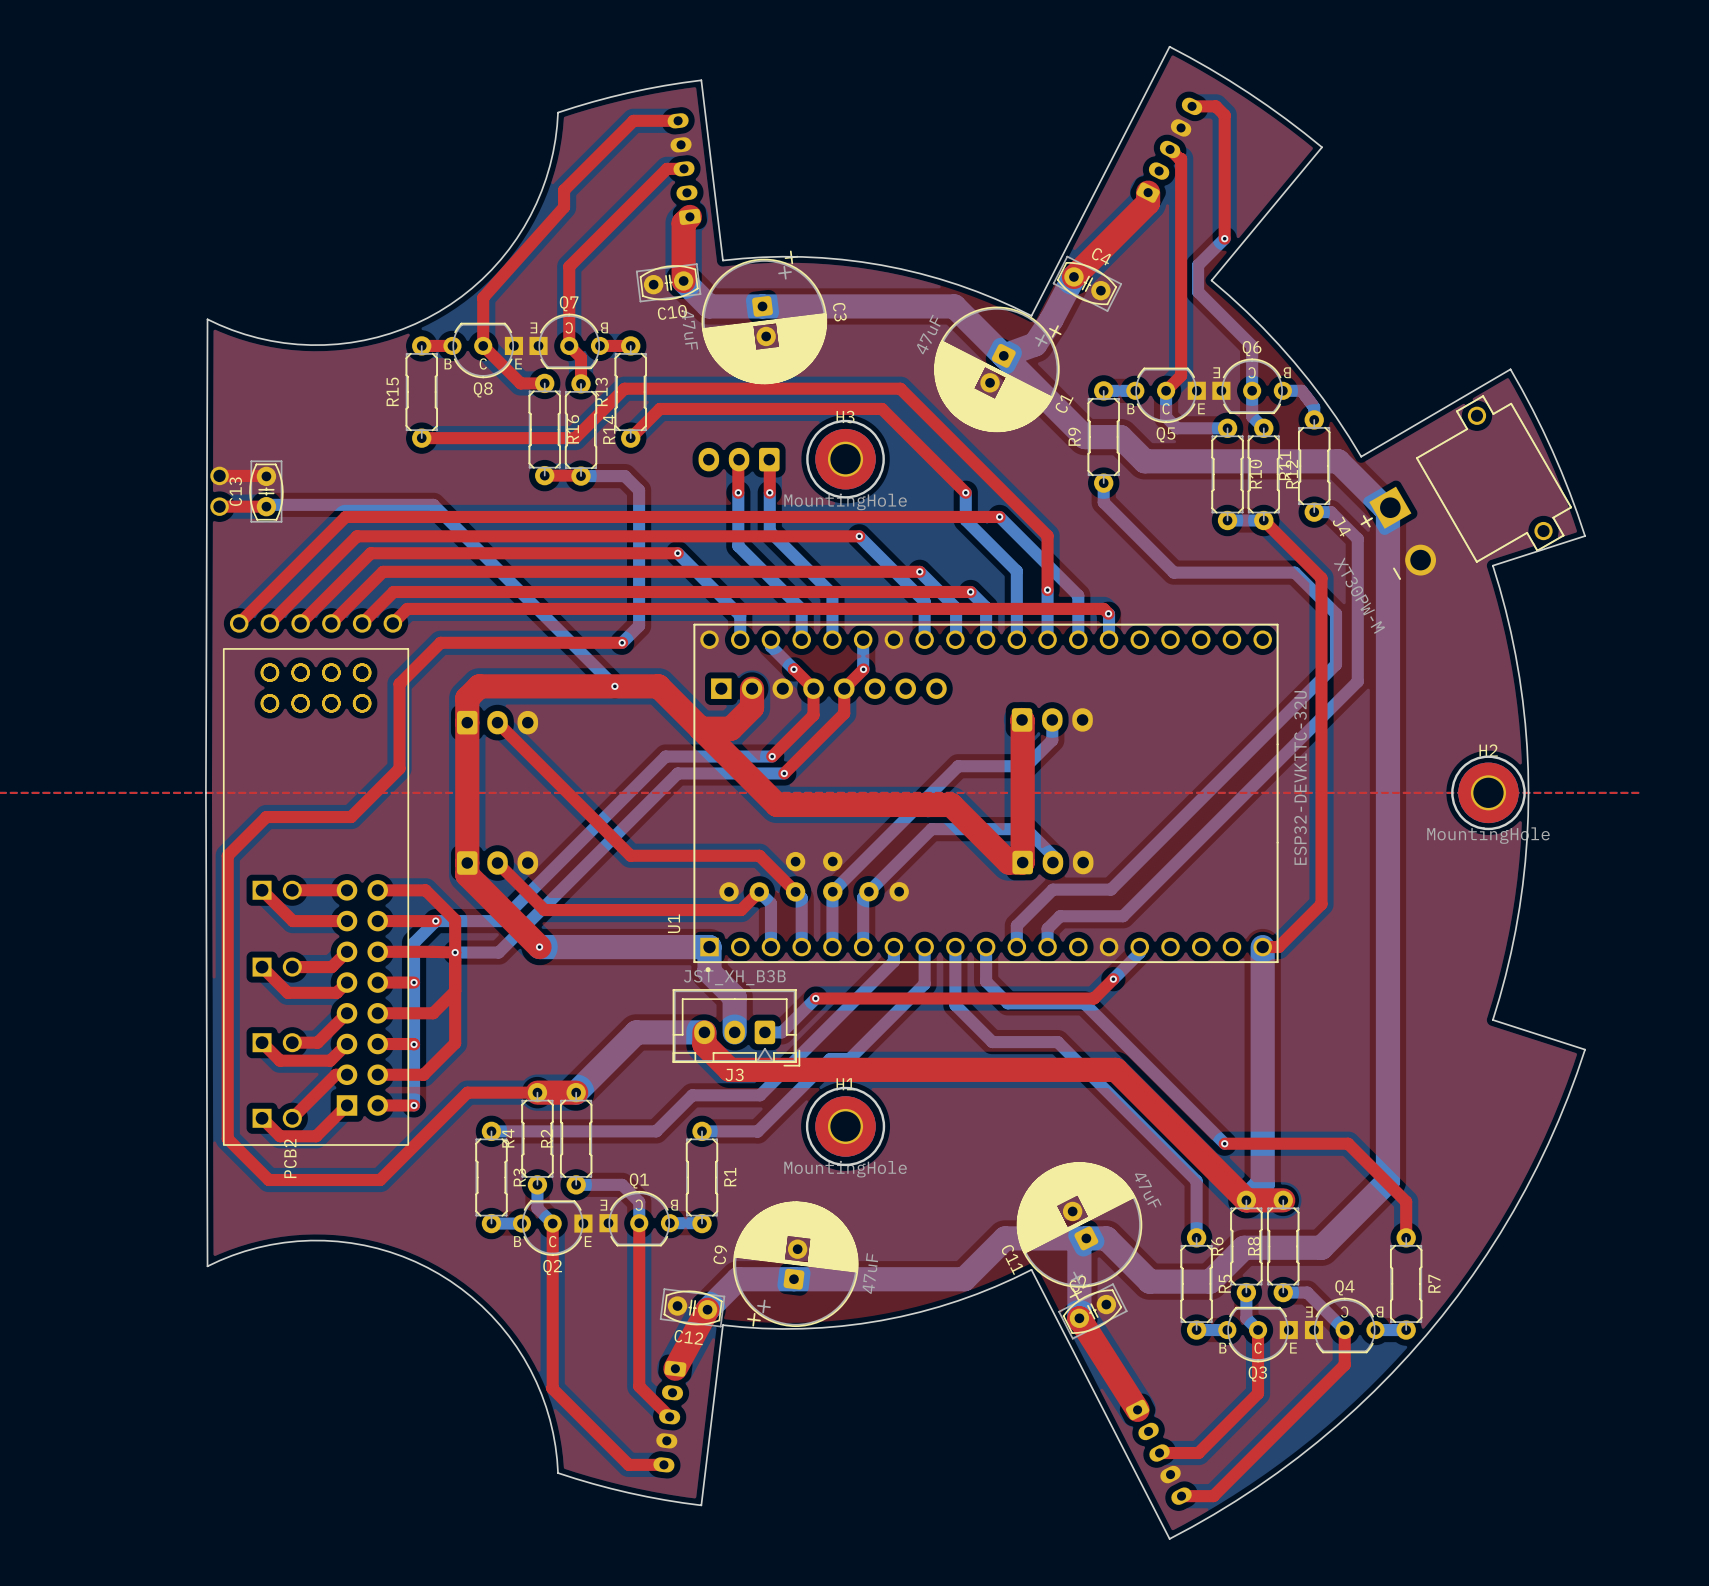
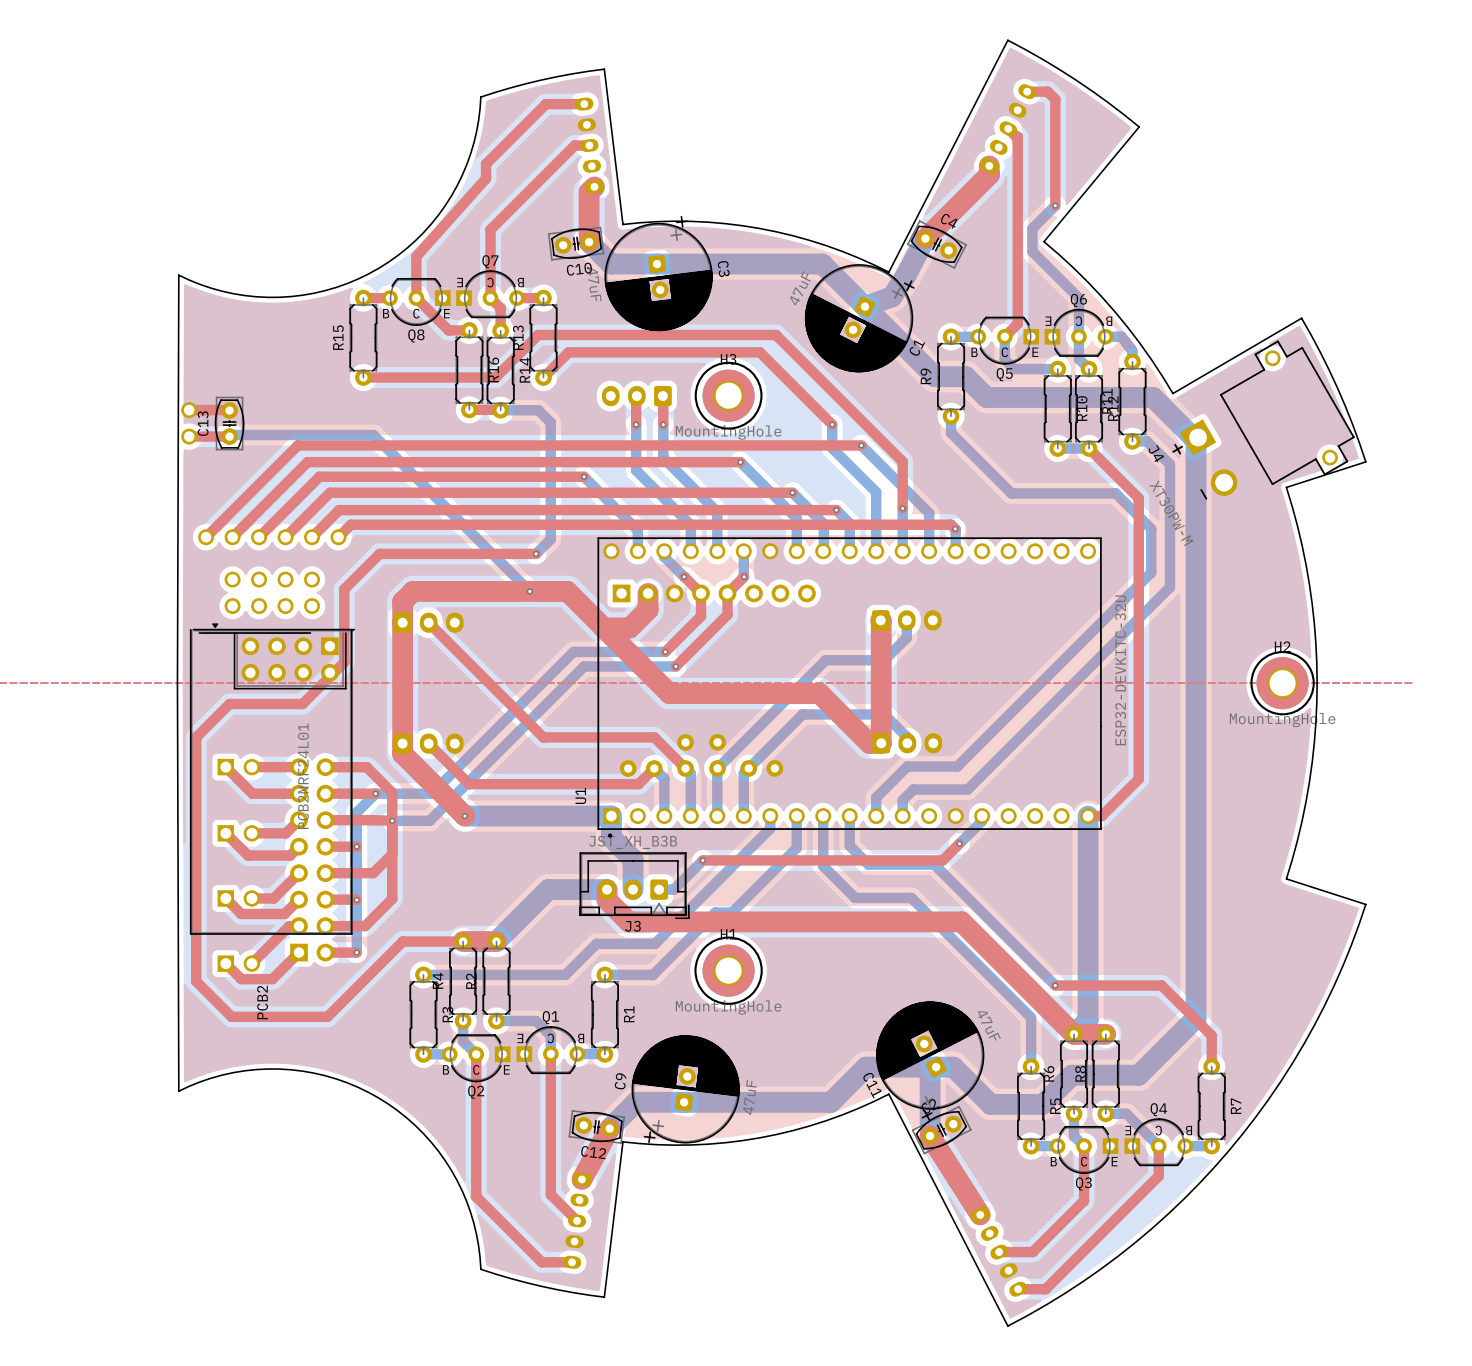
PCB2 footprint: [223, 648, 409, 1146] -> [190, 623, 356, 935]

